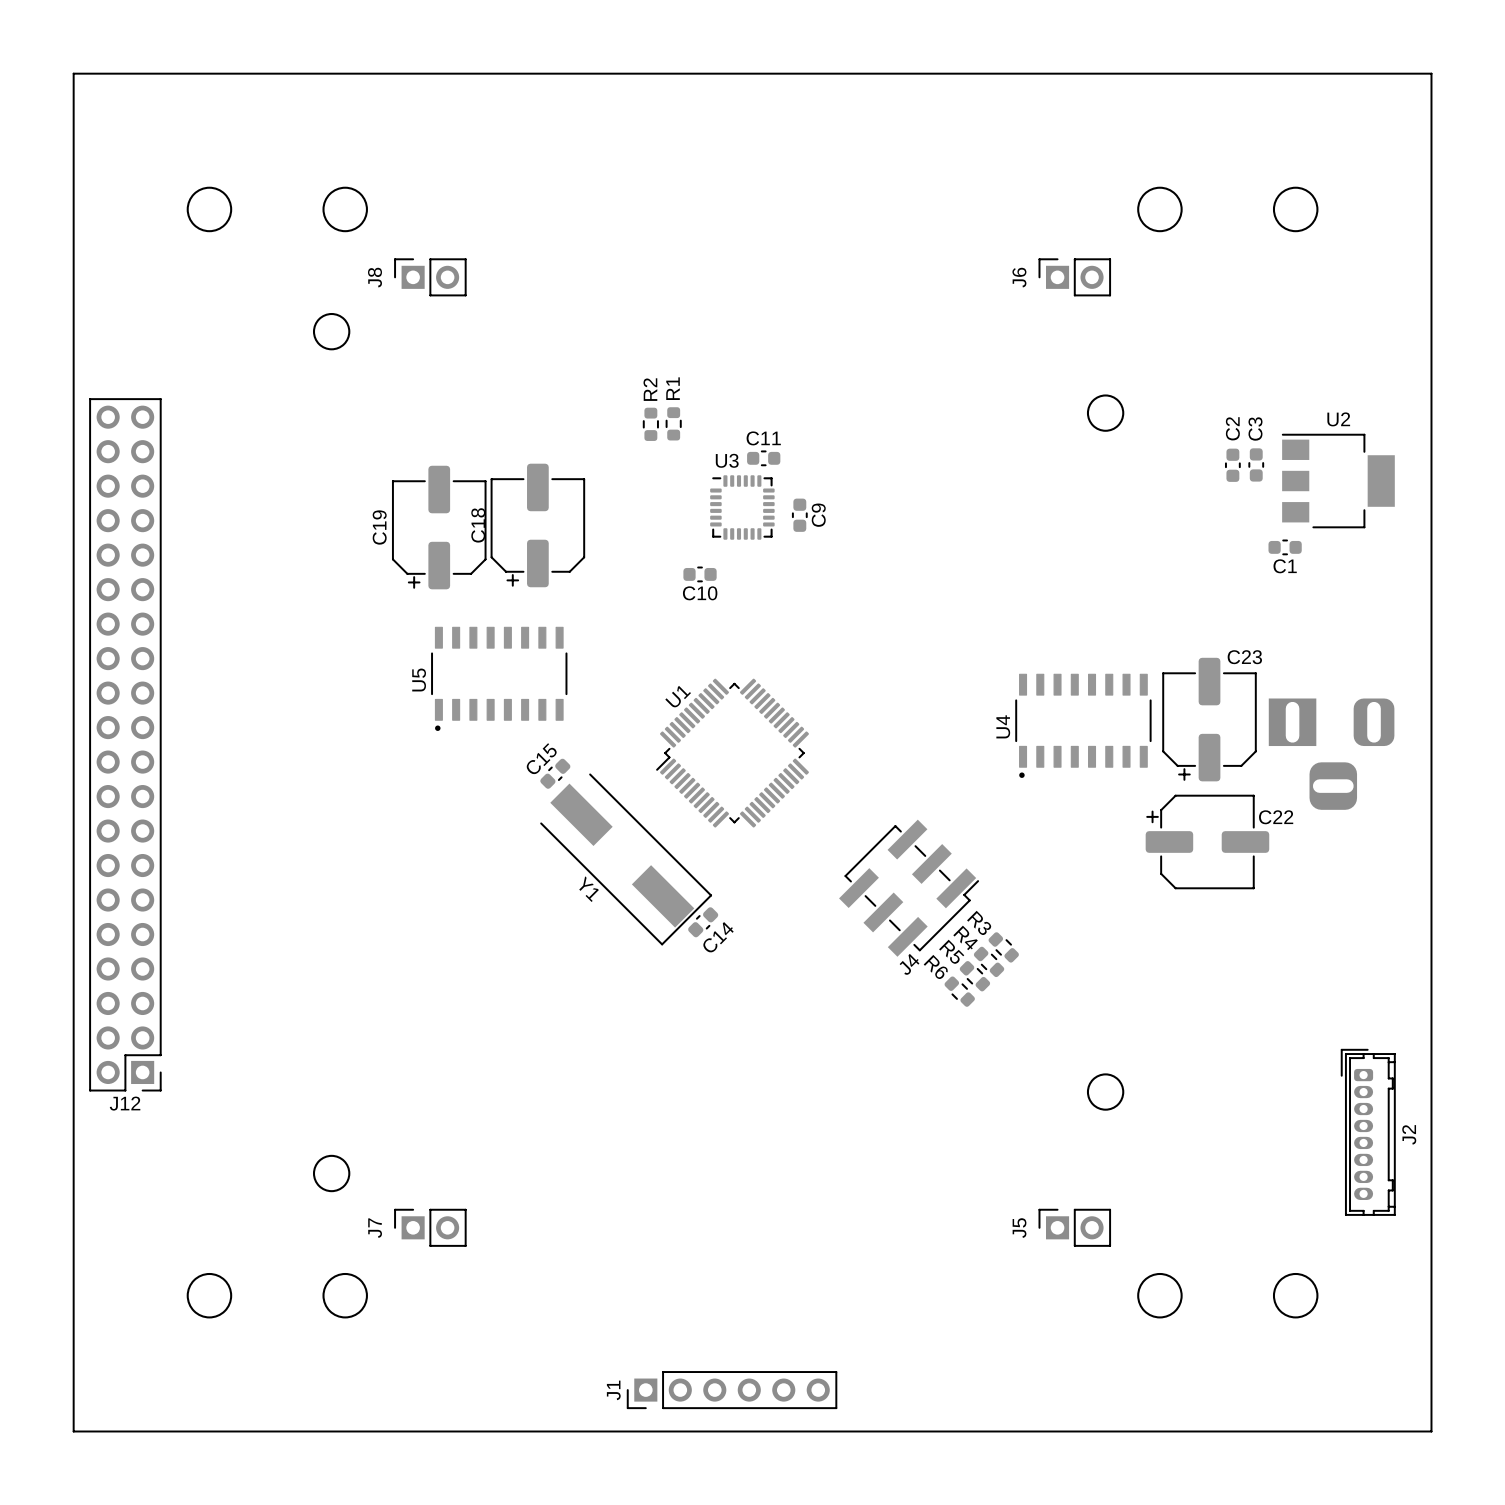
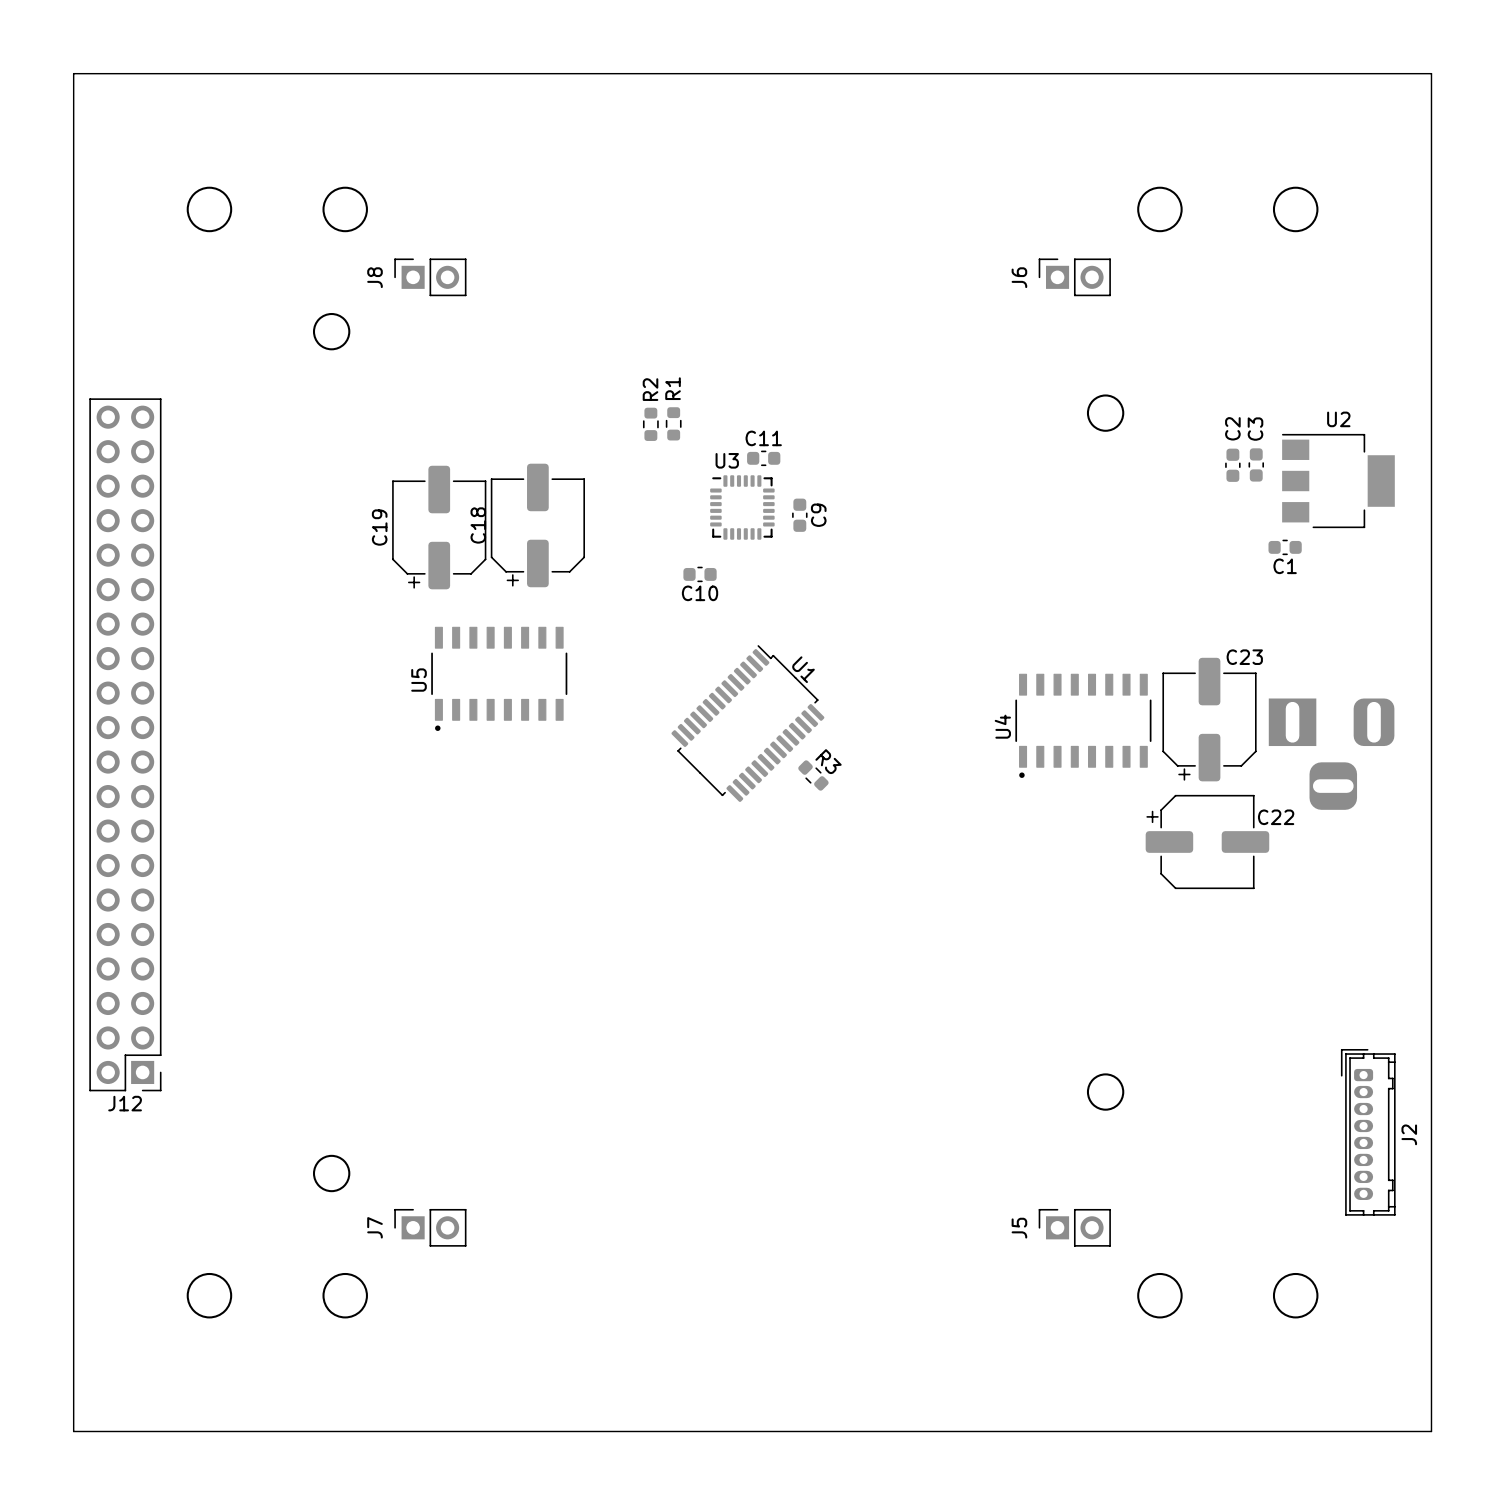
U1 footprint: [656, 678, 809, 828] -> [671, 645, 825, 802]
U1 name position: U1 (678, 696) -> U1 (803, 669)
C15: (555, 773) -> none
Y1: (626, 859) -> none
J4: (908, 888) -> none
C14: (703, 922) -> none
R3 name position: R3 (979, 922) -> R3 (828, 761)
R3 position: (1003, 947) -> (813, 775)
R4: (989, 961) -> none
R5: (974, 976) -> none
R6: (959, 991) -> none
J1: (732, 1390) -> none

